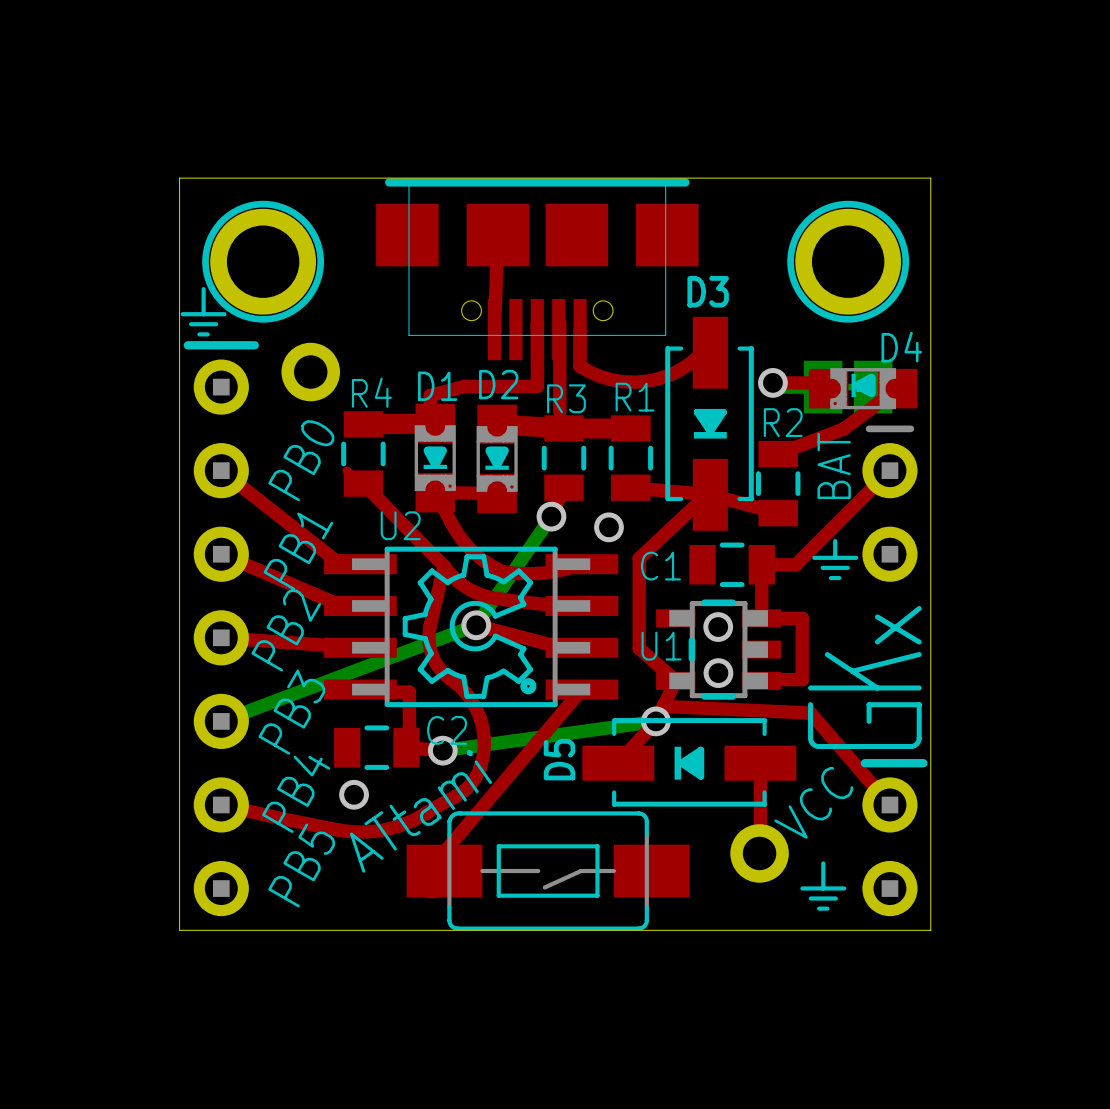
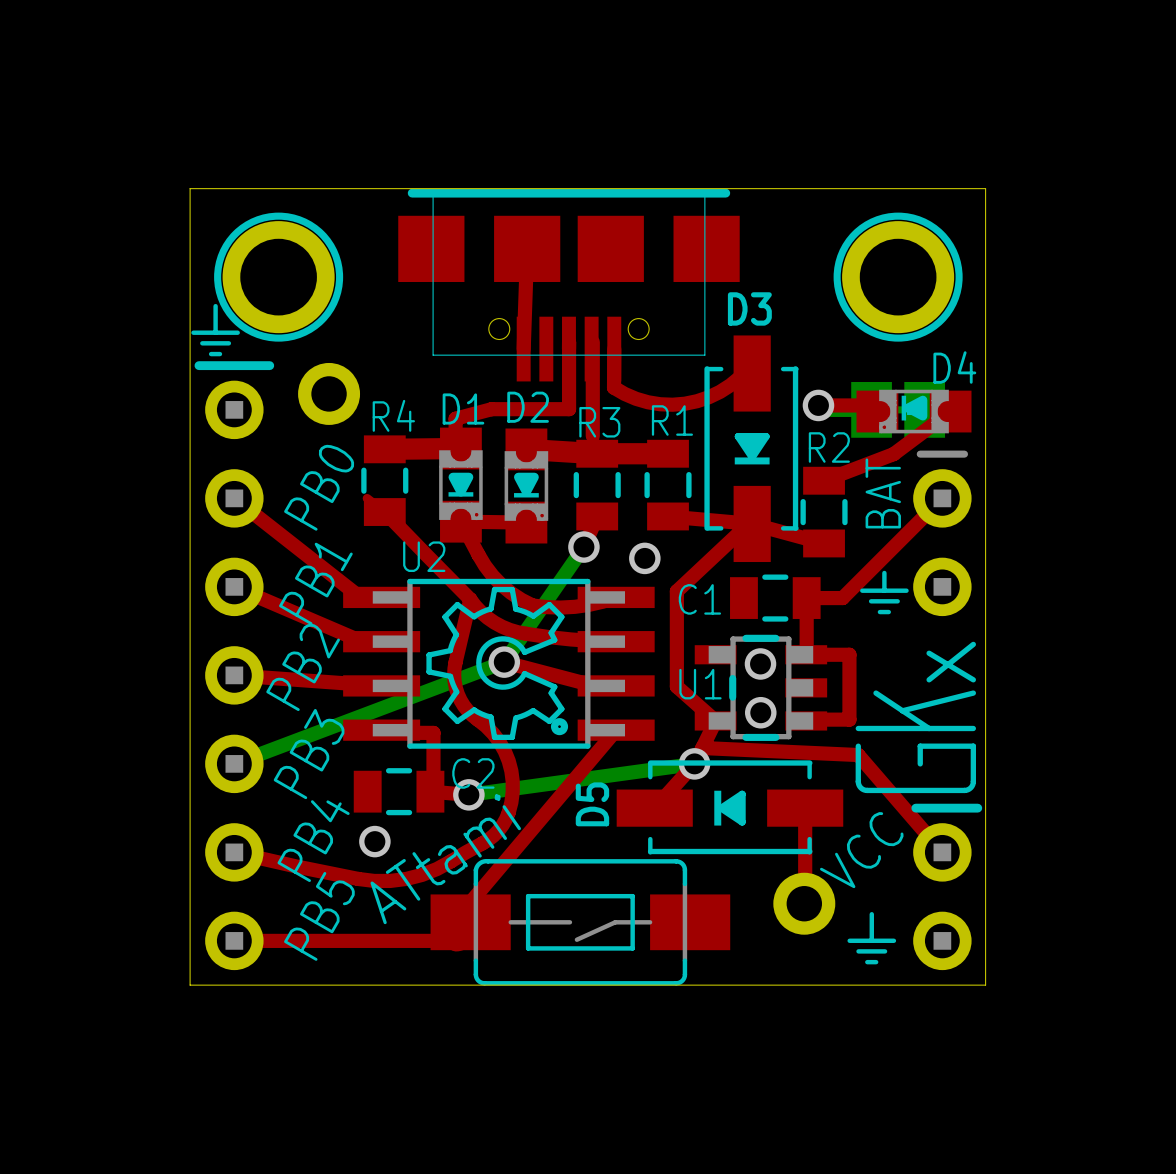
top track: none -> (234, 940) (437, 940)

